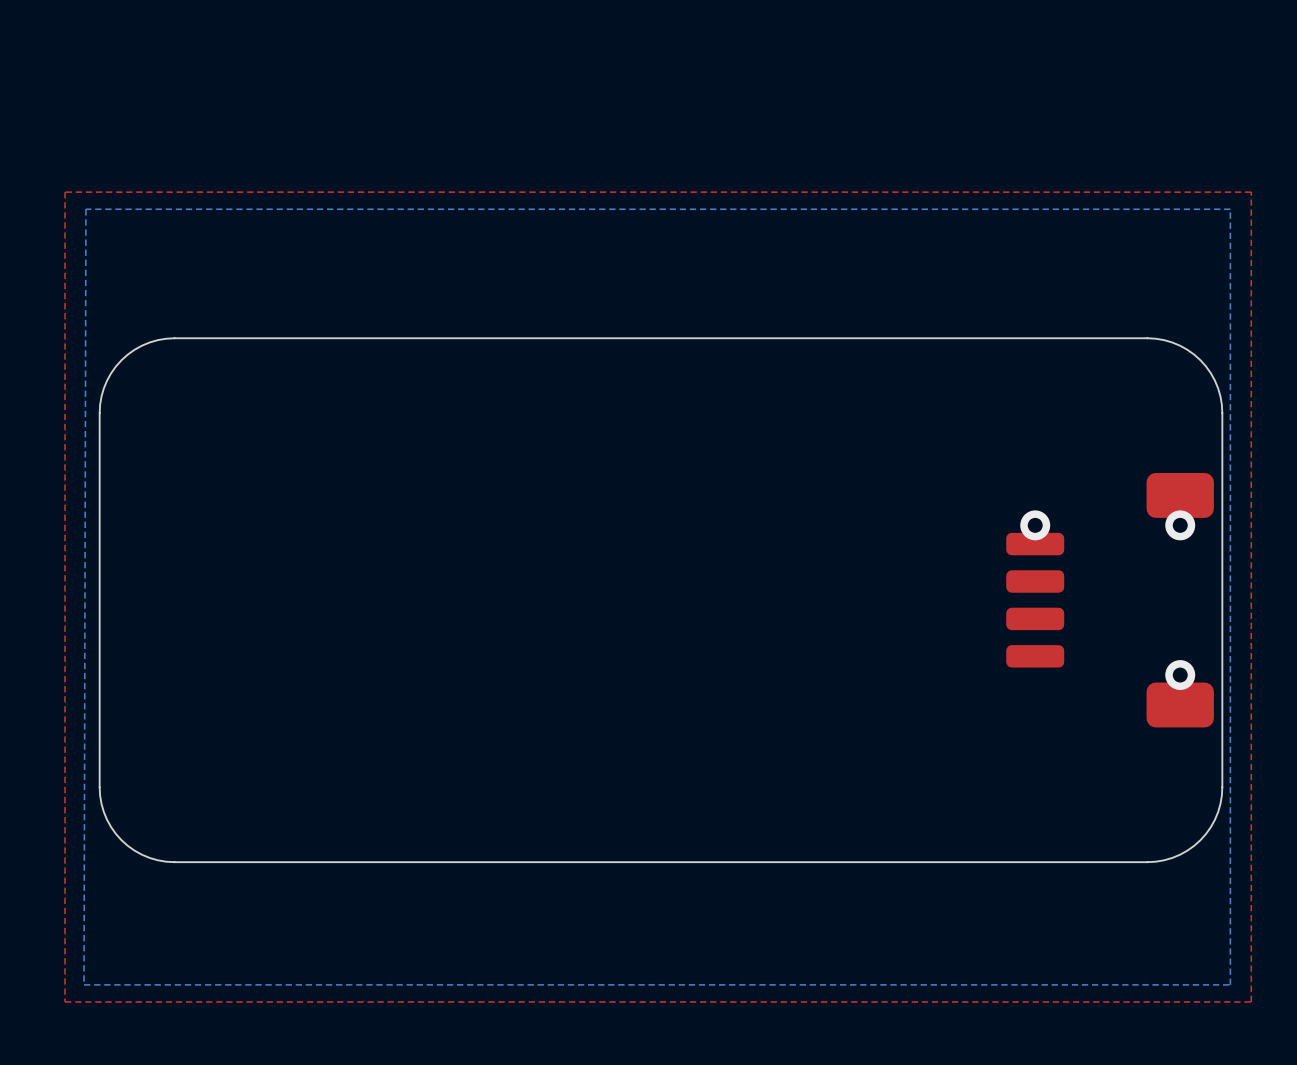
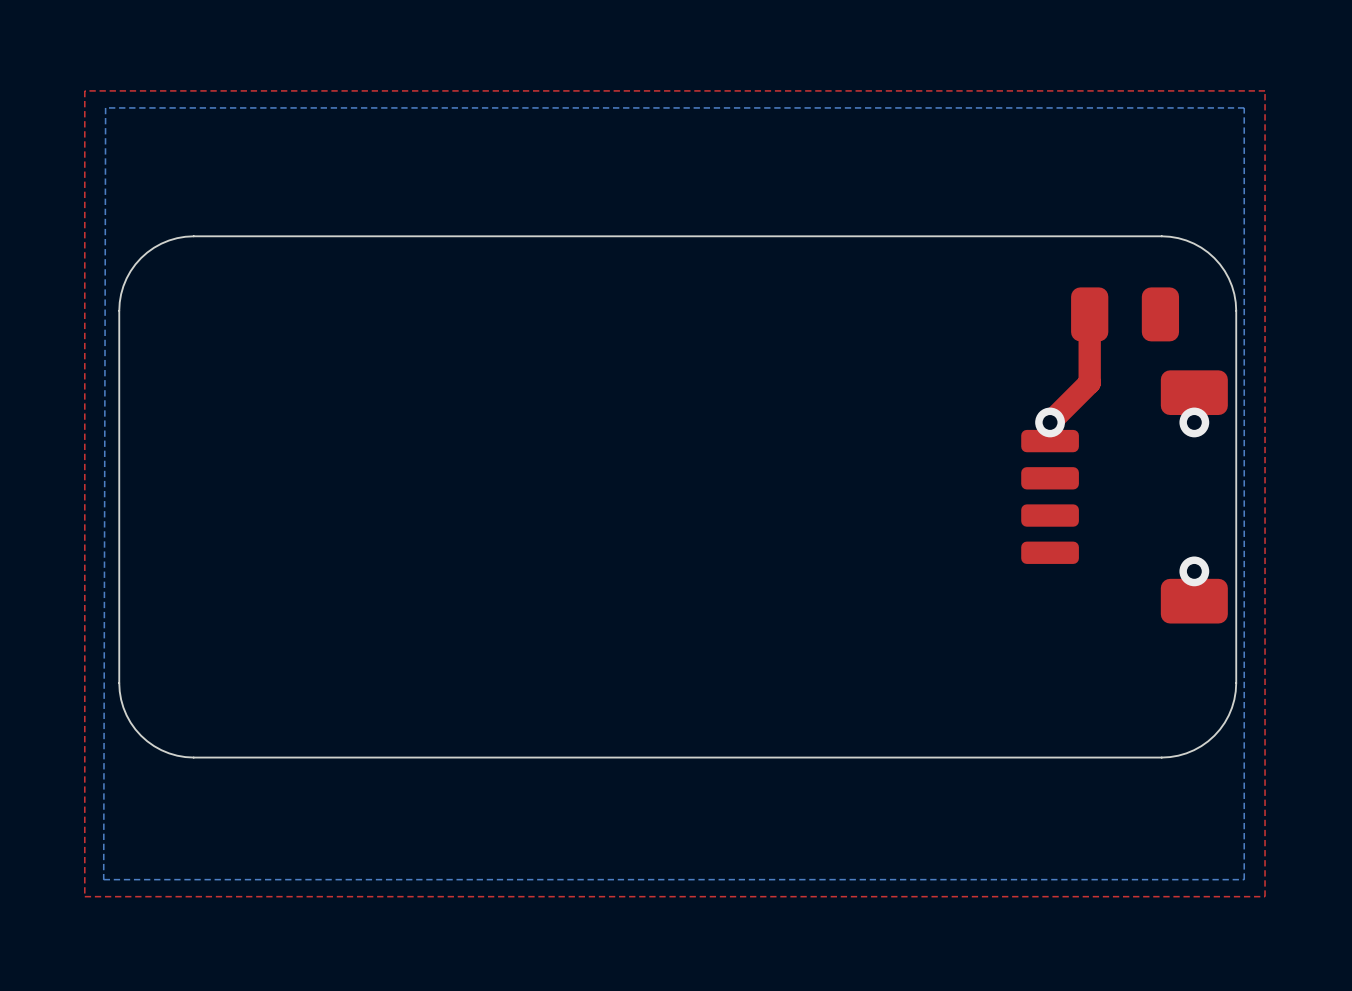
top track: none -> (1089, 314) (1089, 382) (1050, 422)
part: none -> (1125, 314)

